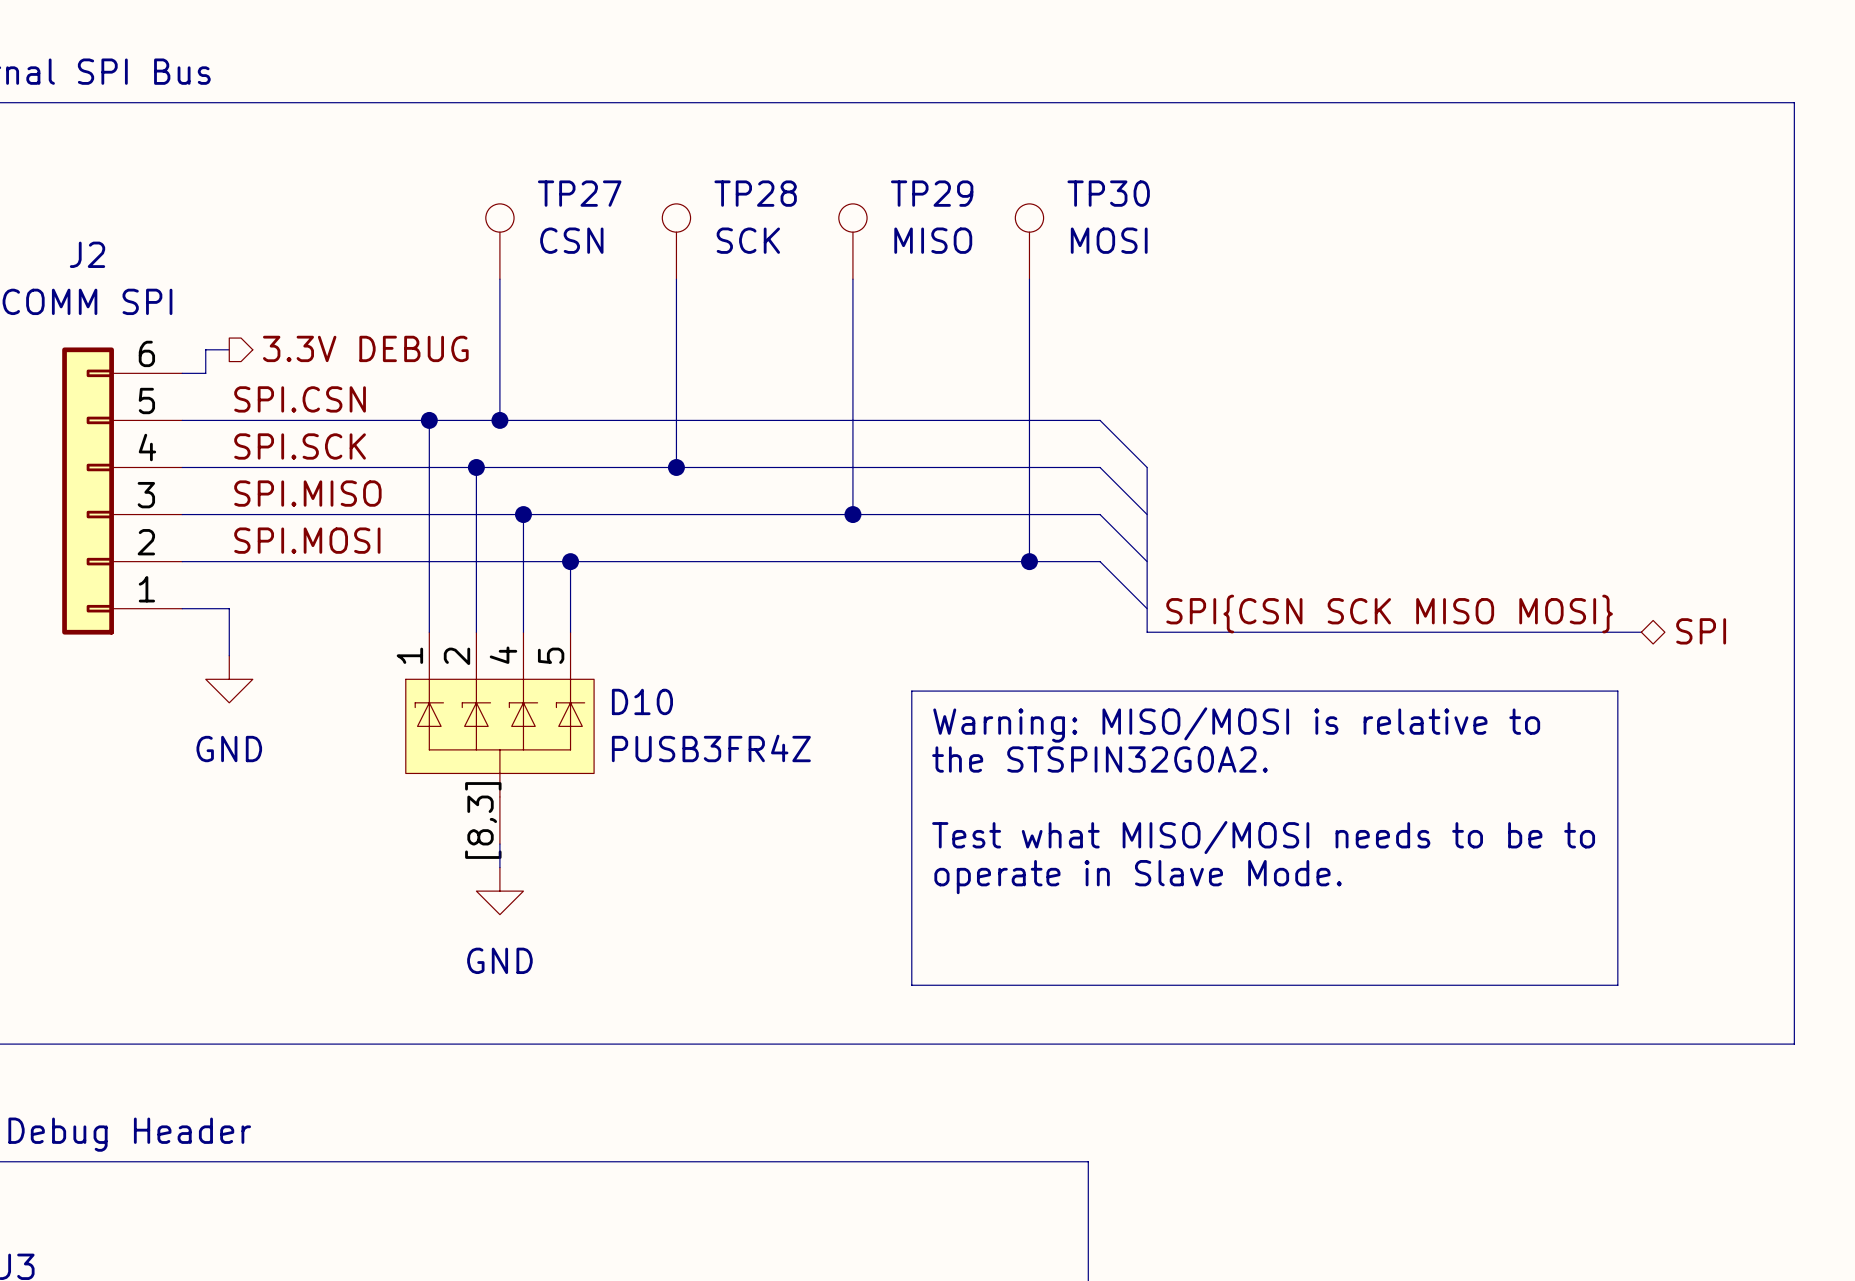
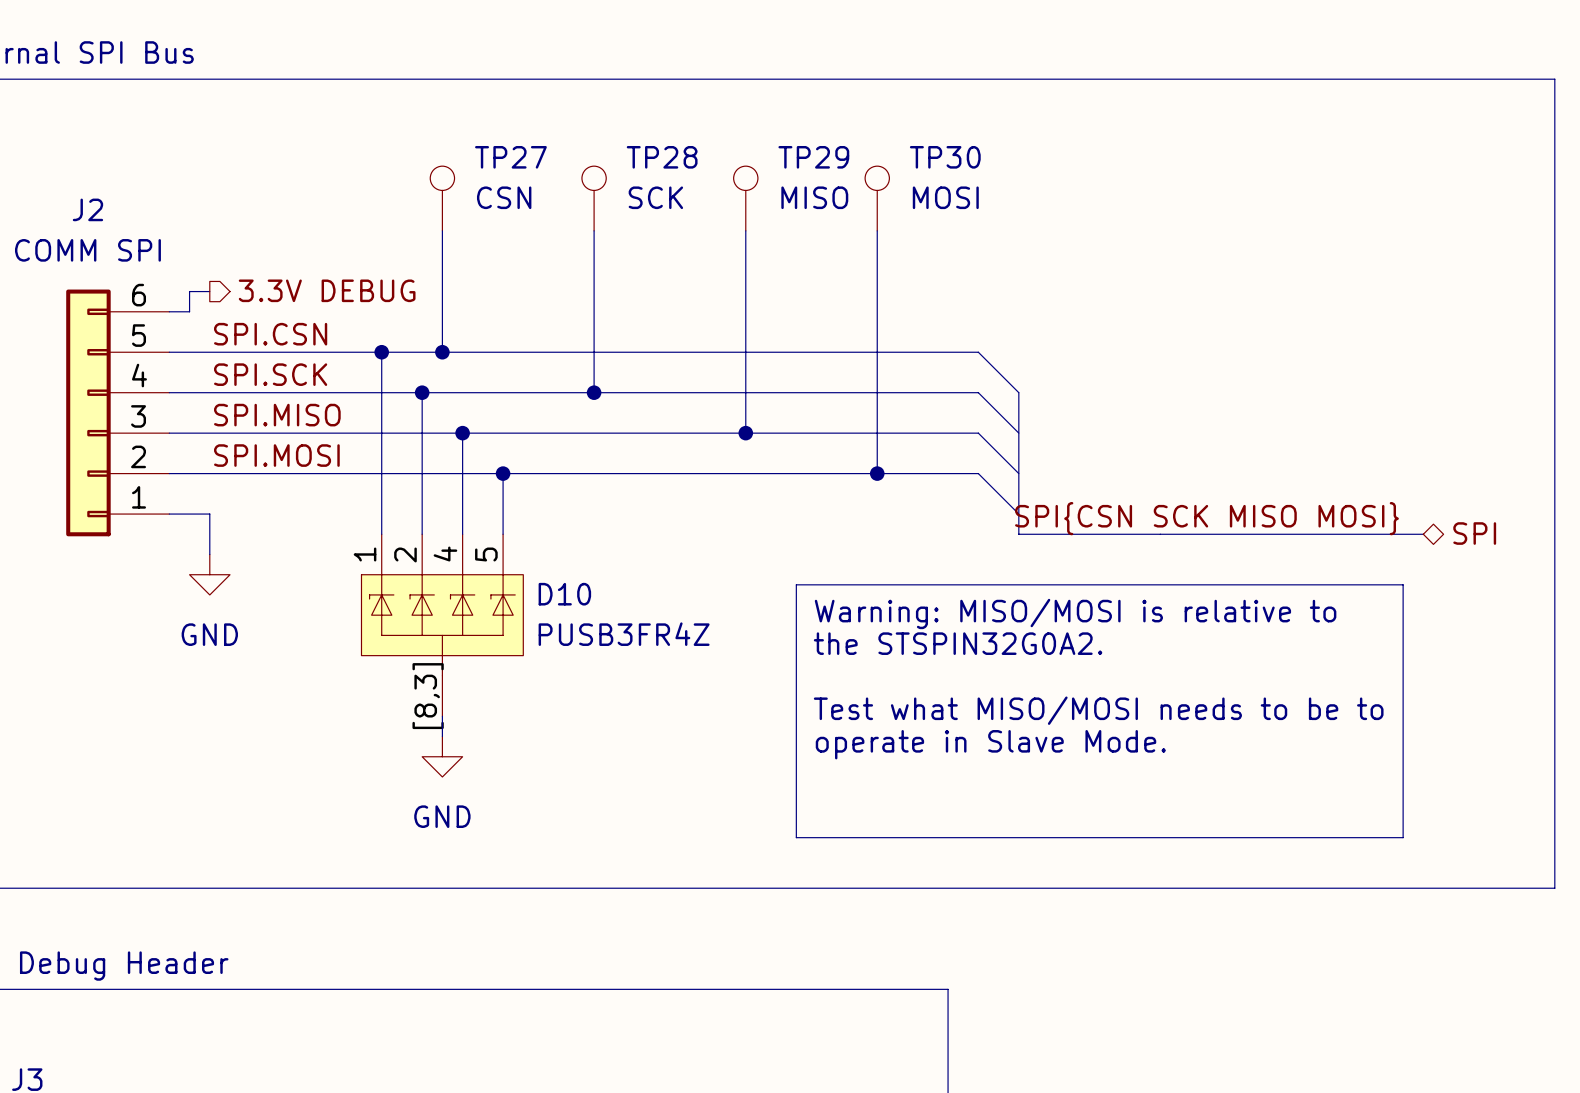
TP30 position: (1029, 241) -> (877, 198)
wire: (1029, 279) (1029, 561) -> (877, 230) (877, 473)
wire: (1100, 420) (1147, 467) -> (958, 352) (978, 352) (1018, 392)
wire: (1100, 467) (1147, 514) -> (958, 392) (978, 392) (1018, 433)
bus: (1147, 467) (1147, 632) (1170, 632) -> (1018, 392) (1018, 534)
wire: (1100, 514) (1147, 561) -> (958, 433) (978, 433) (1018, 473)
junction position: (1029, 561) -> (877, 473)
wire: (1100, 561) (1147, 608) -> (958, 473) (978, 473) (1018, 514)

